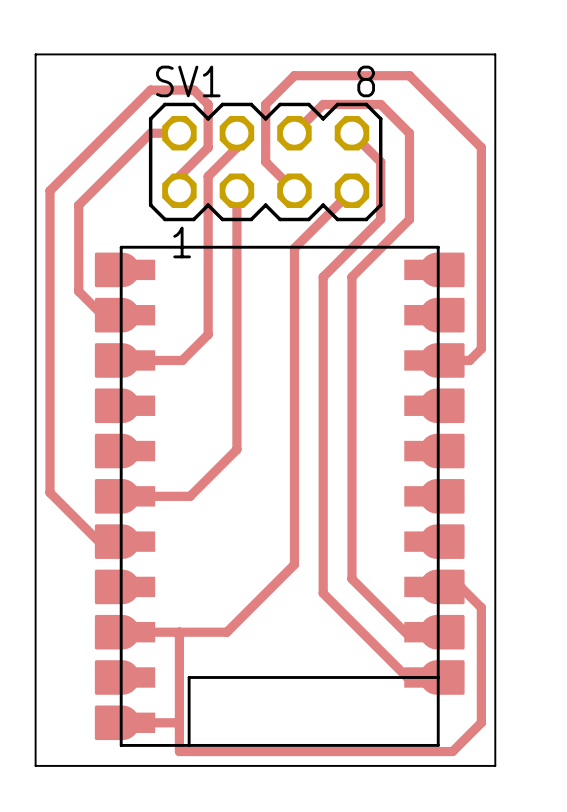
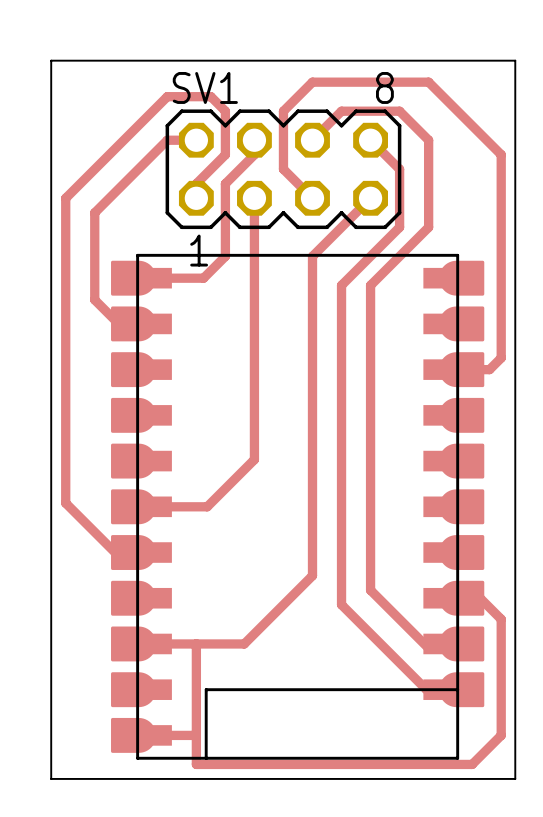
track: (208, 248) (208, 334) (182, 360) (125, 360) -> (225, 256) (203, 278) (142, 278)

